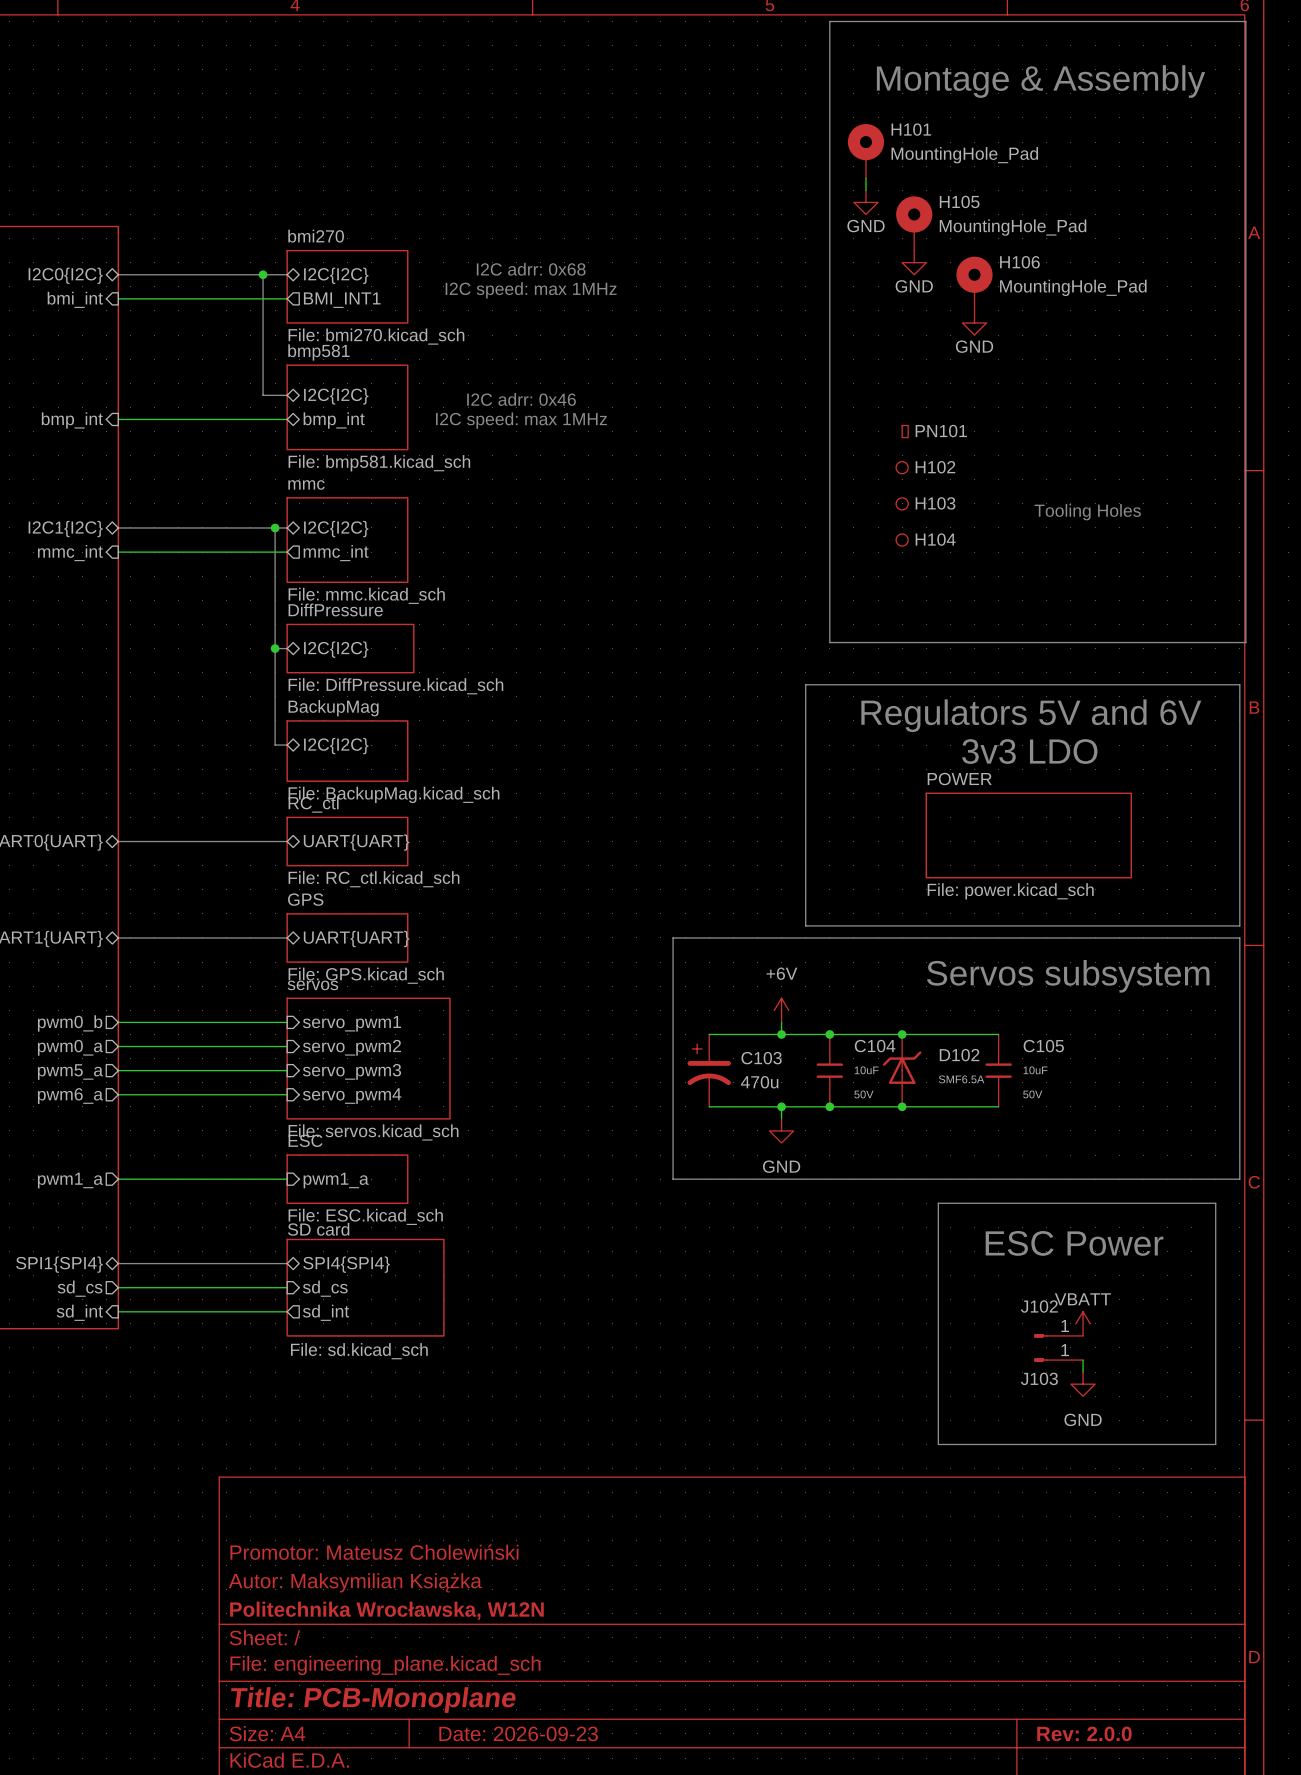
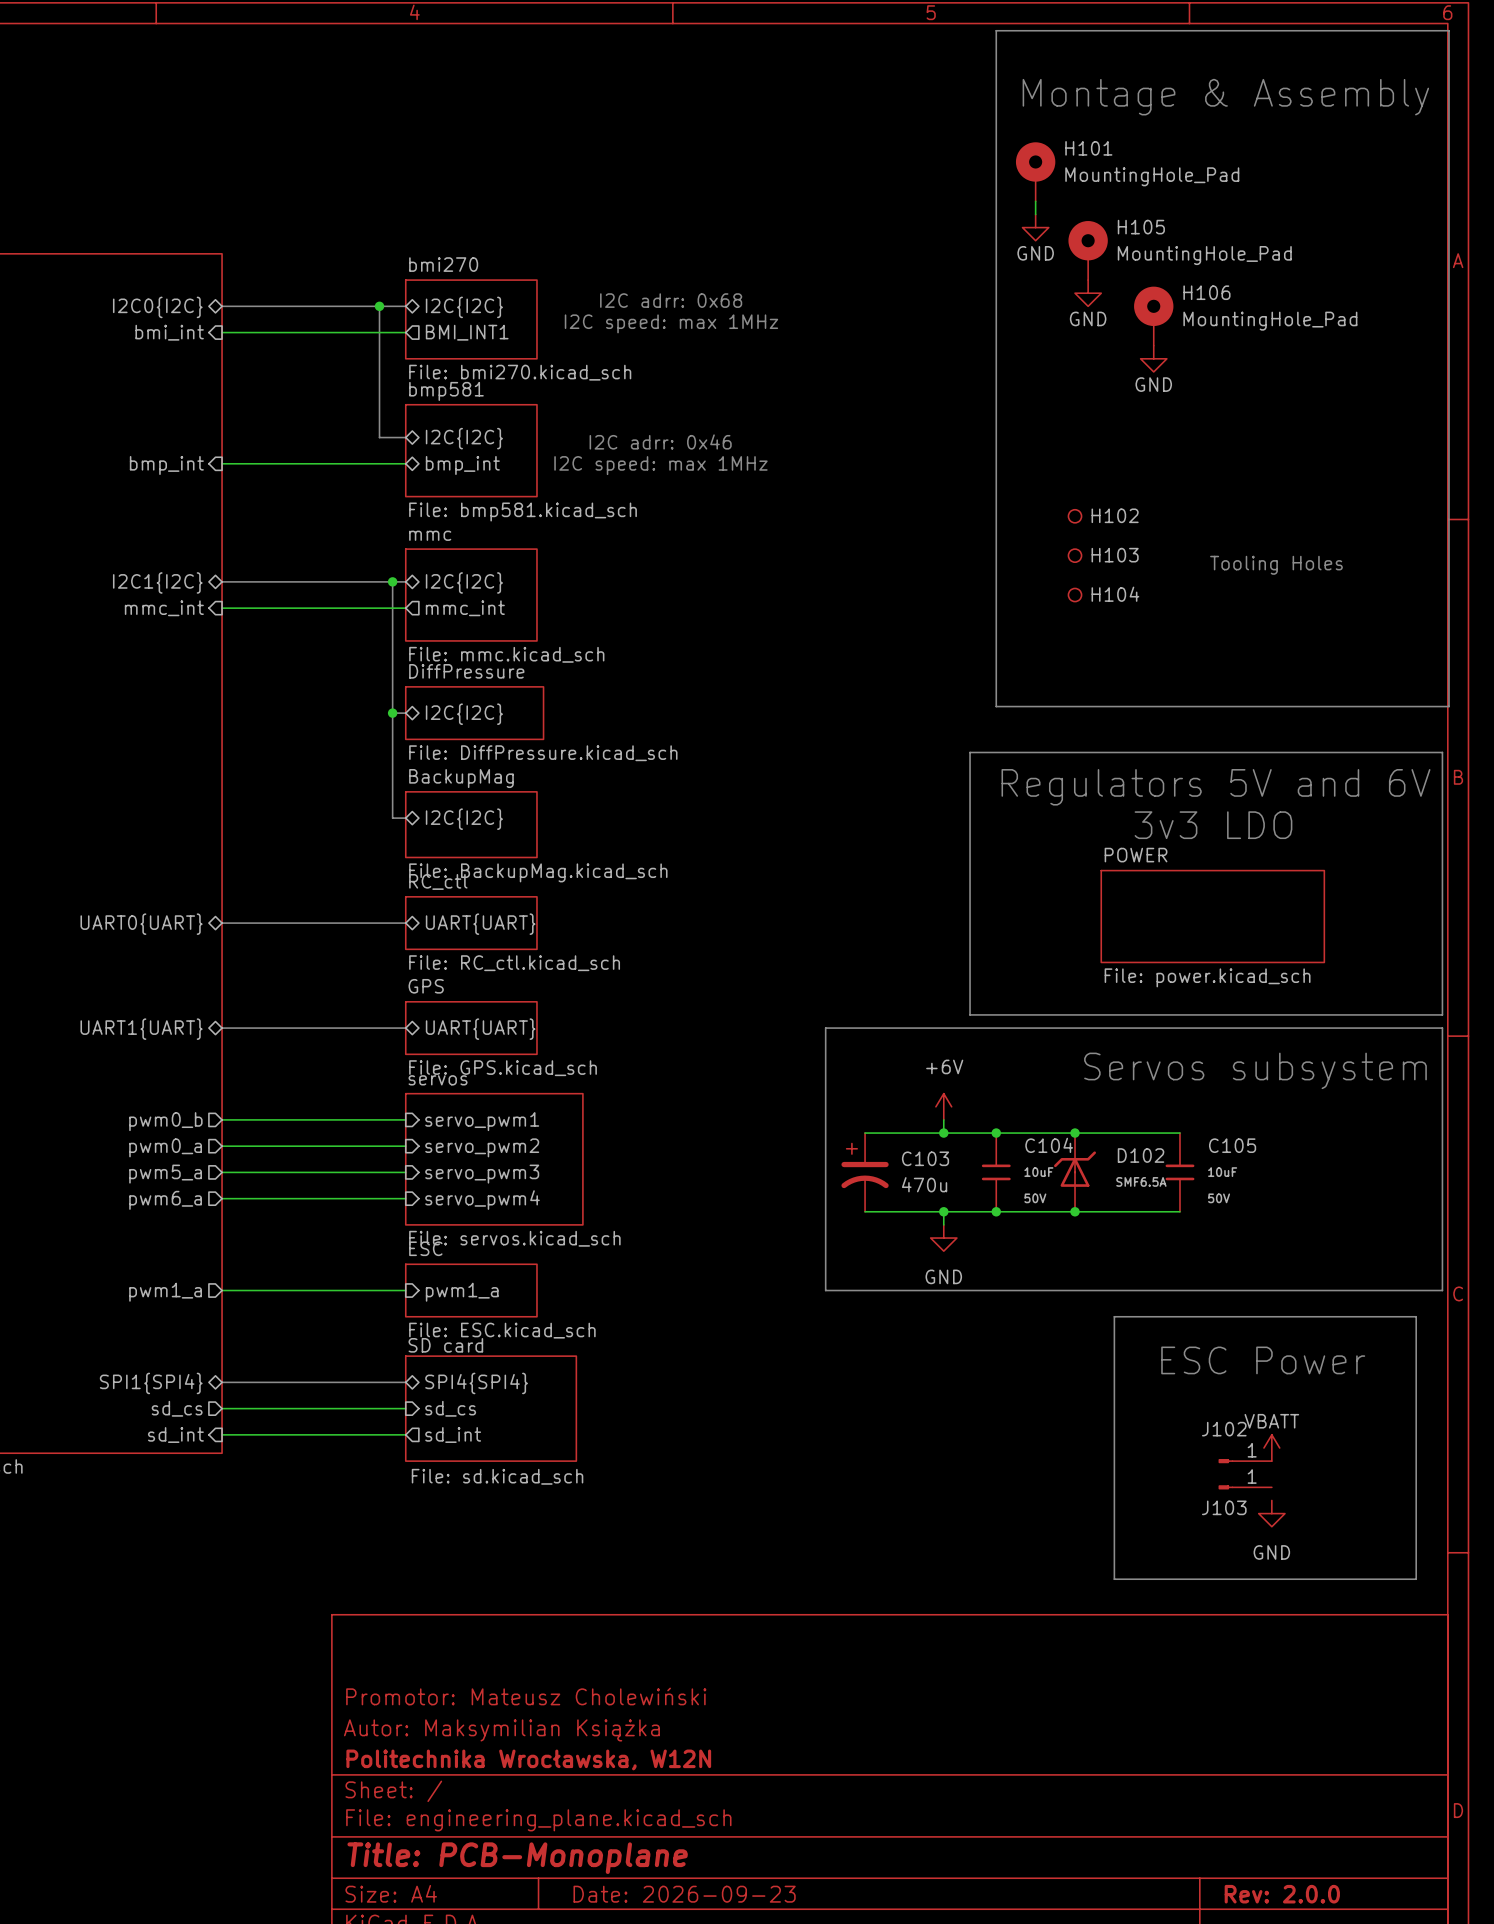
PN101: (905, 431) -> none
wire: (1083, 1360) (1083, 1372) -> none

